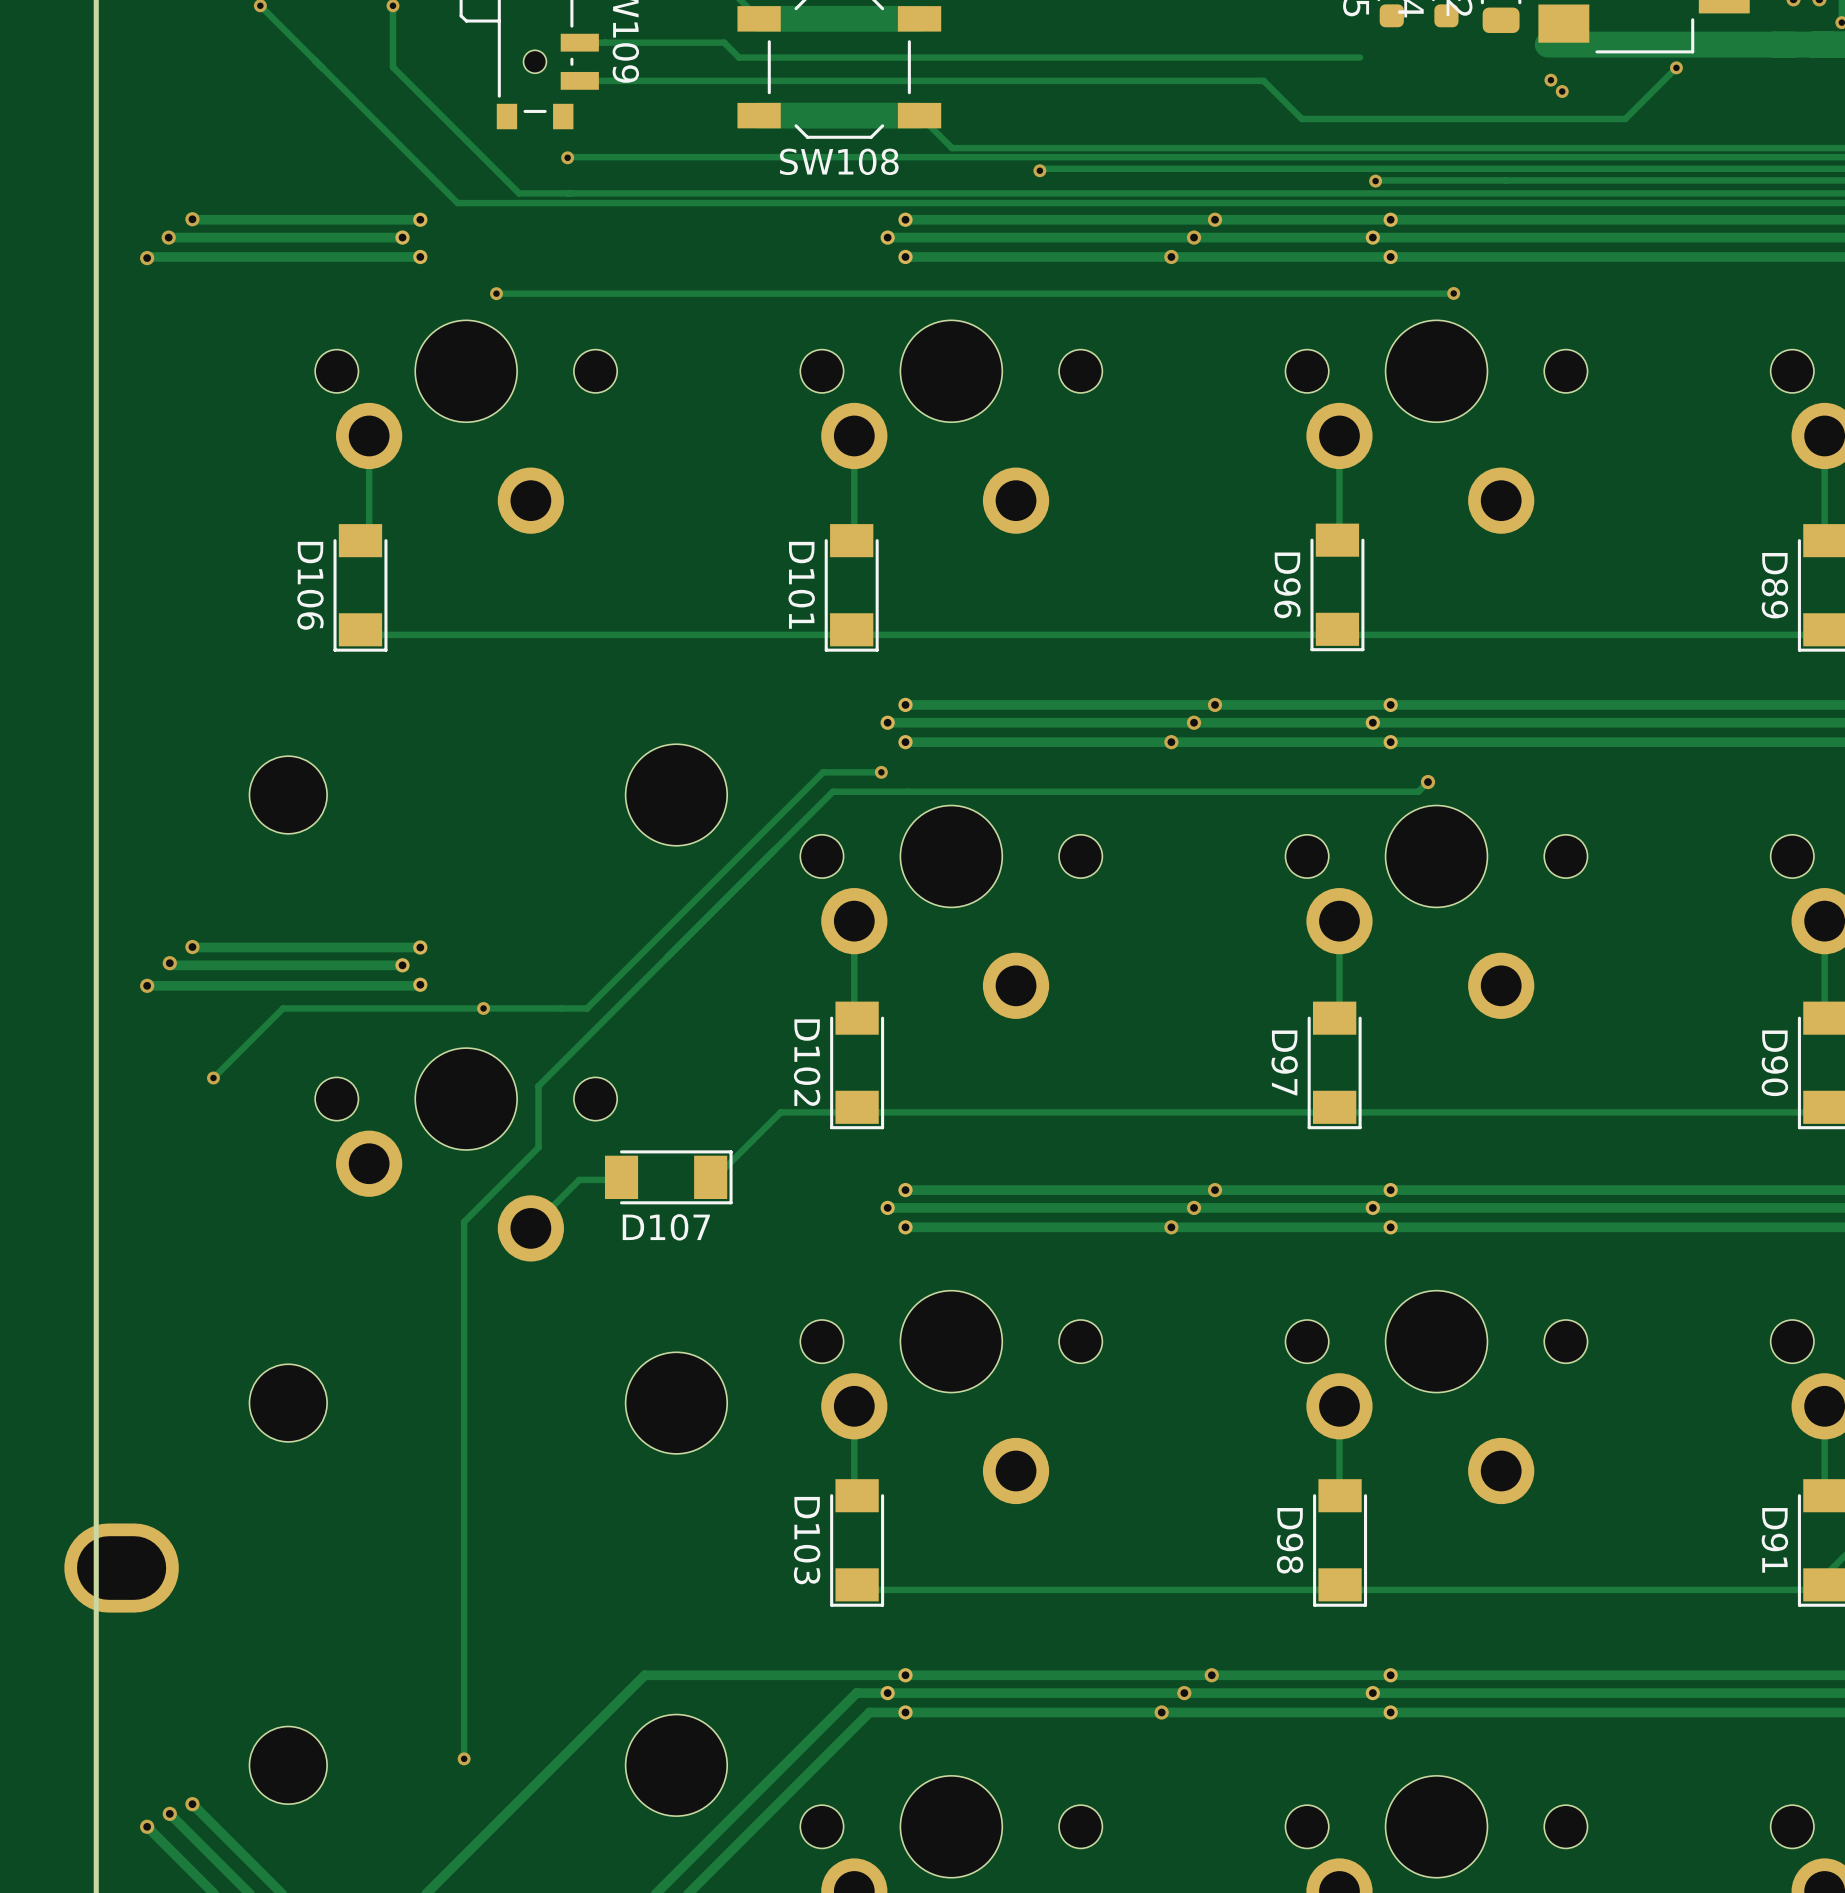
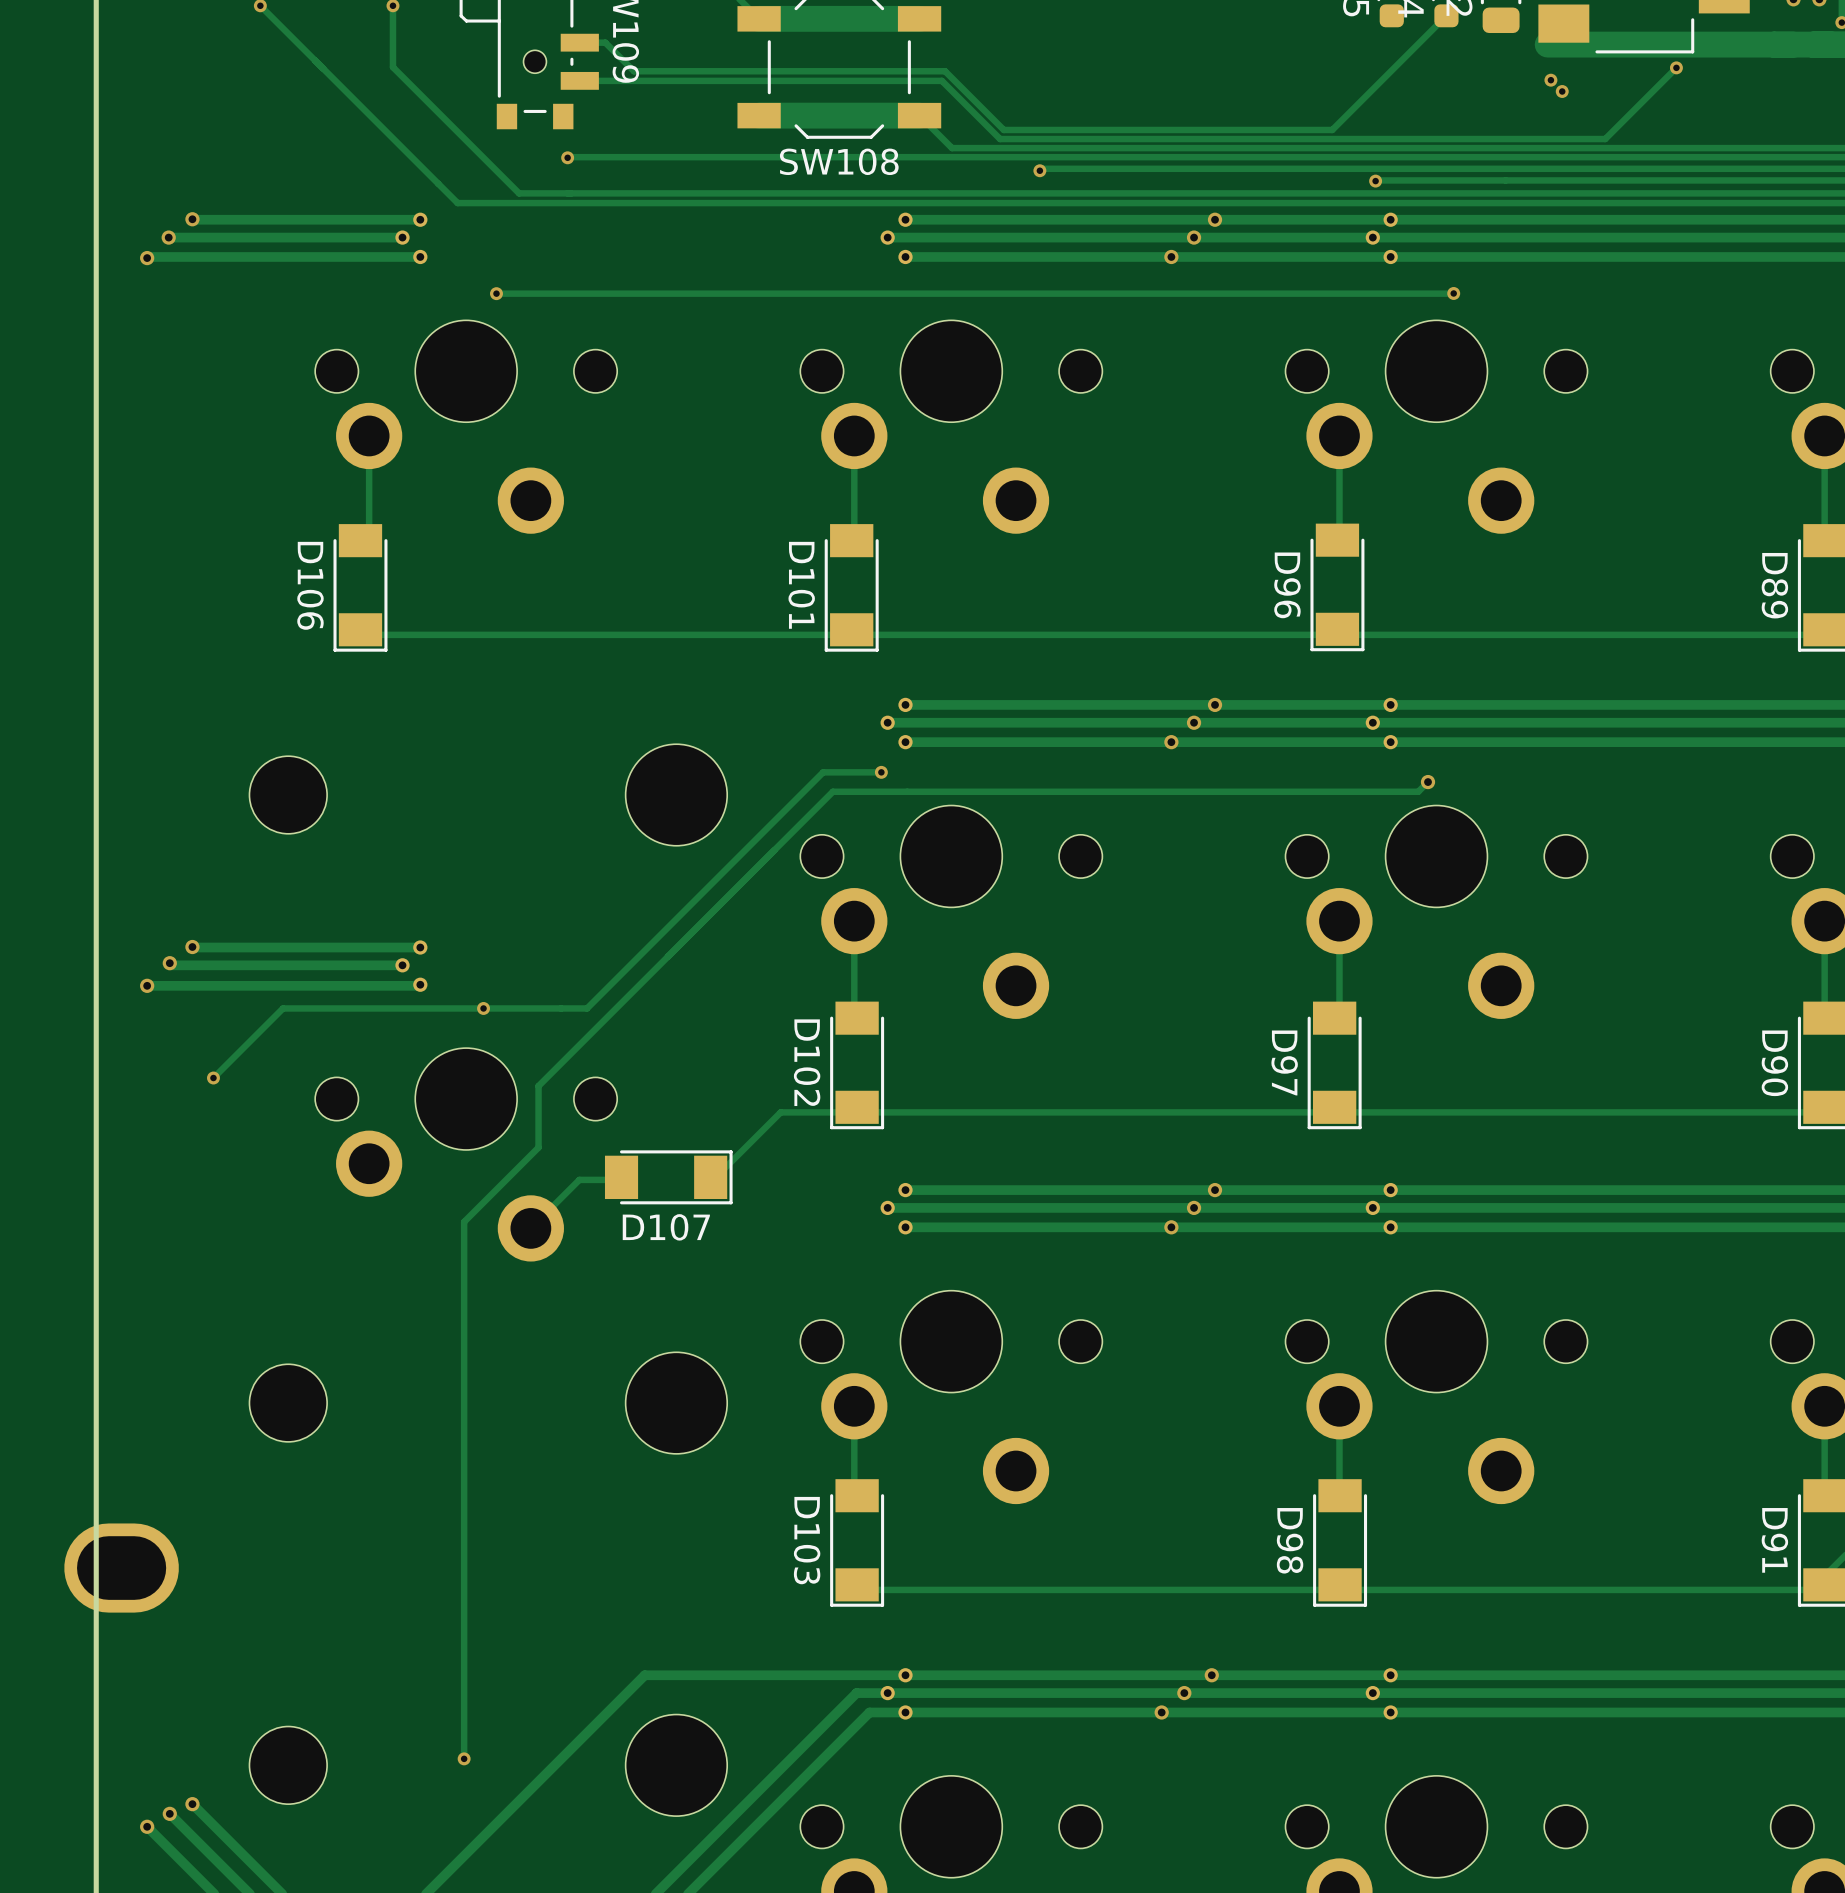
track: (605, 42) (724, 42) (739, 57) (1360, 57) -> (605, 42) (633, 71) (945, 71) (1003, 129) (1332, 129) (1446, 15)
track: (941, 80) (1263, 80) (1301, 118) (1625, 118) -> (941, 80) (1000, 139) (1605, 139) (1625, 118)

